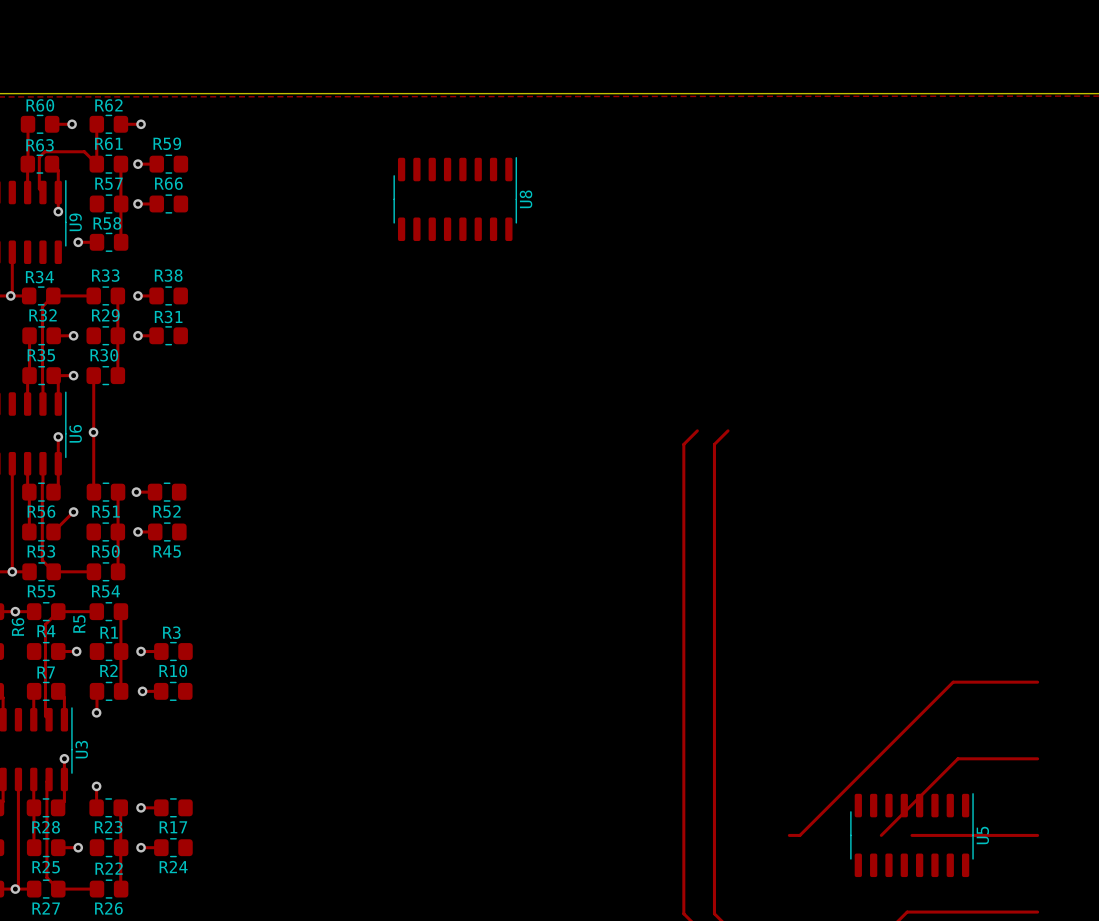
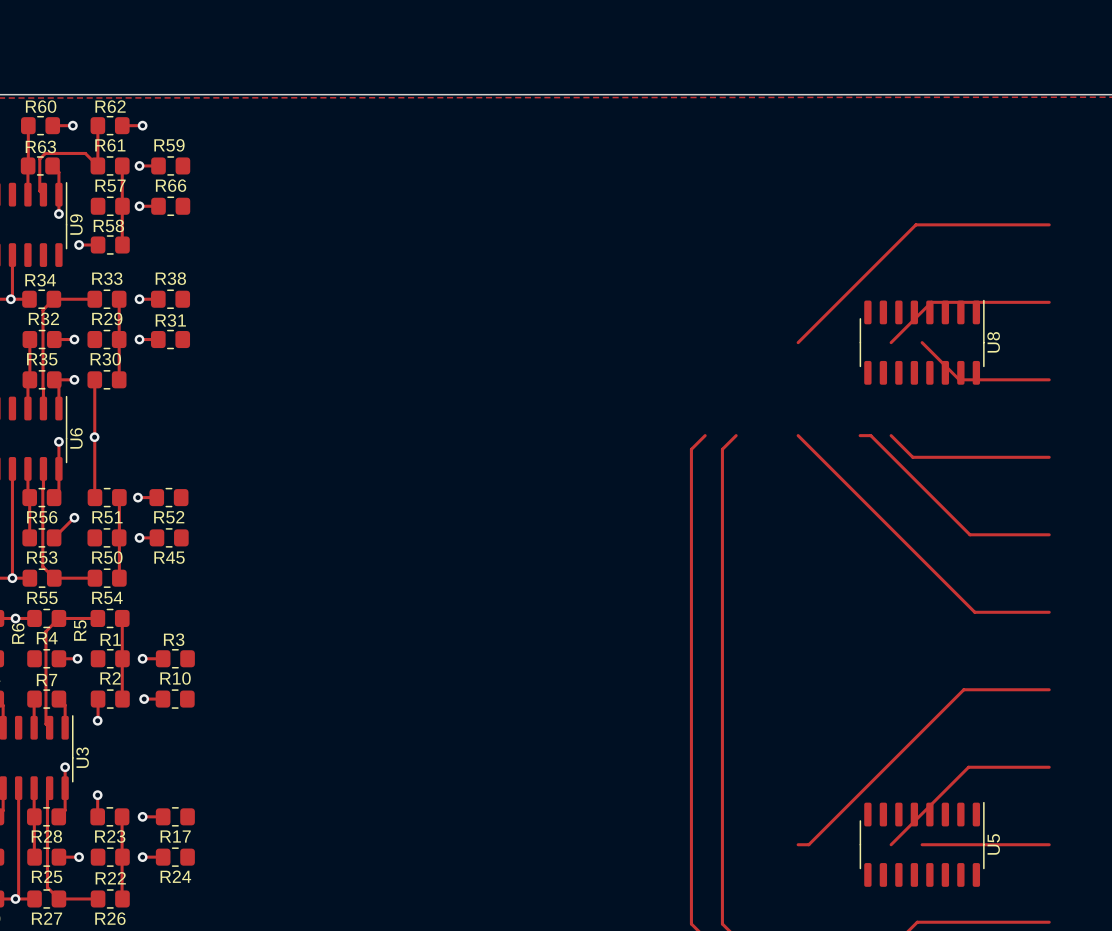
U8 position: (455, 199) -> (922, 342)
track: none -> (1049, 224) (915, 224) (798, 342)
track: none -> (1049, 302) (931, 302) (891, 342)
track: none -> (922, 342) (959, 379) (1049, 379)
track: none -> (798, 435) (974, 612) (1049, 612)
track: none -> (860, 435) (870, 435) (969, 534) (1049, 534)
track: none -> (891, 435) (912, 457) (1049, 457)

